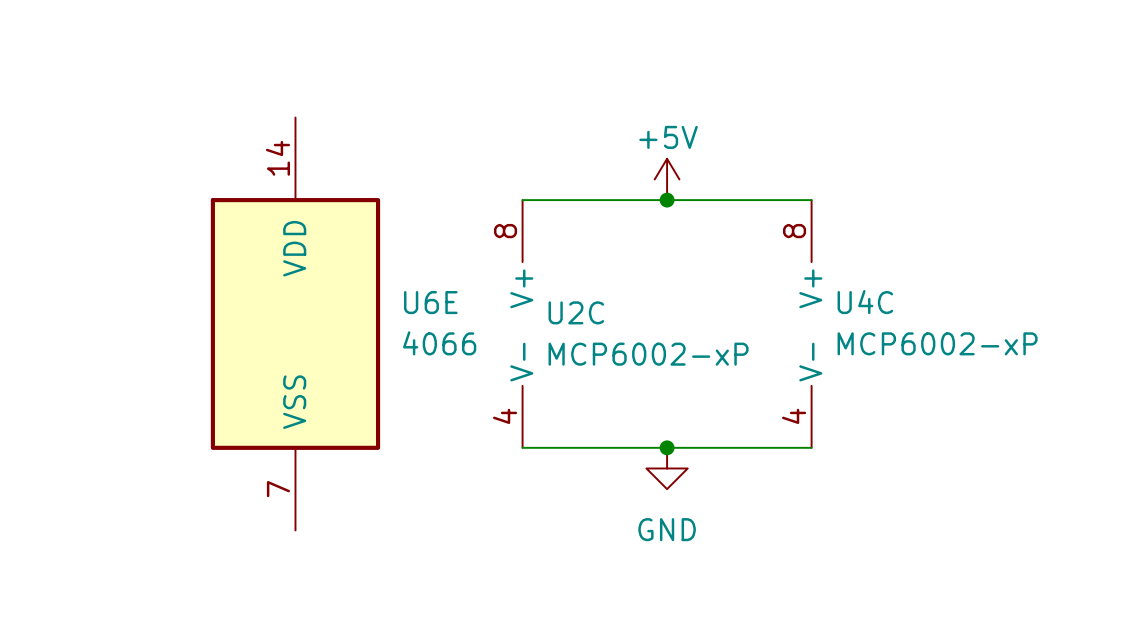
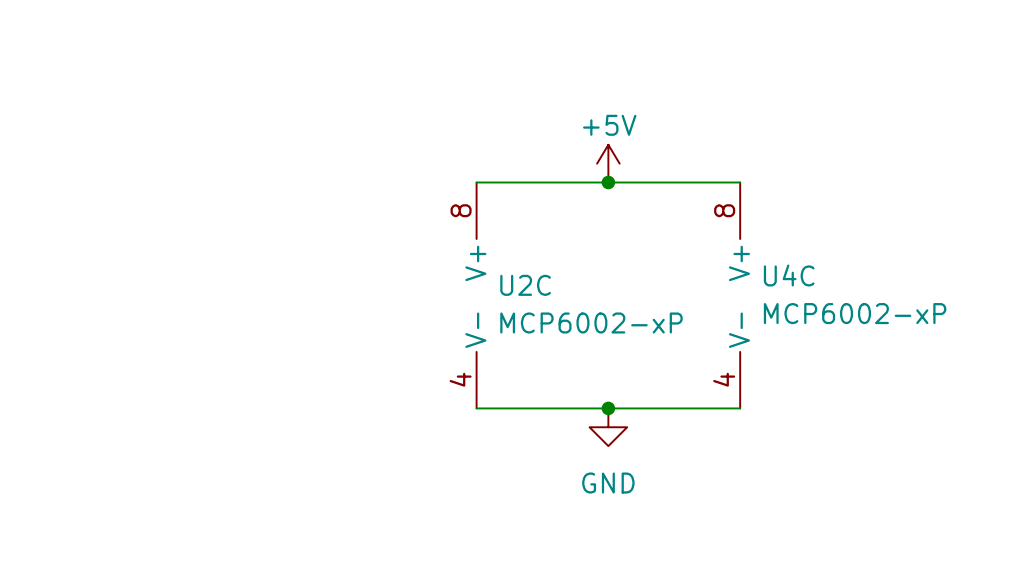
U6E: 4066 (295, 323) -> none

